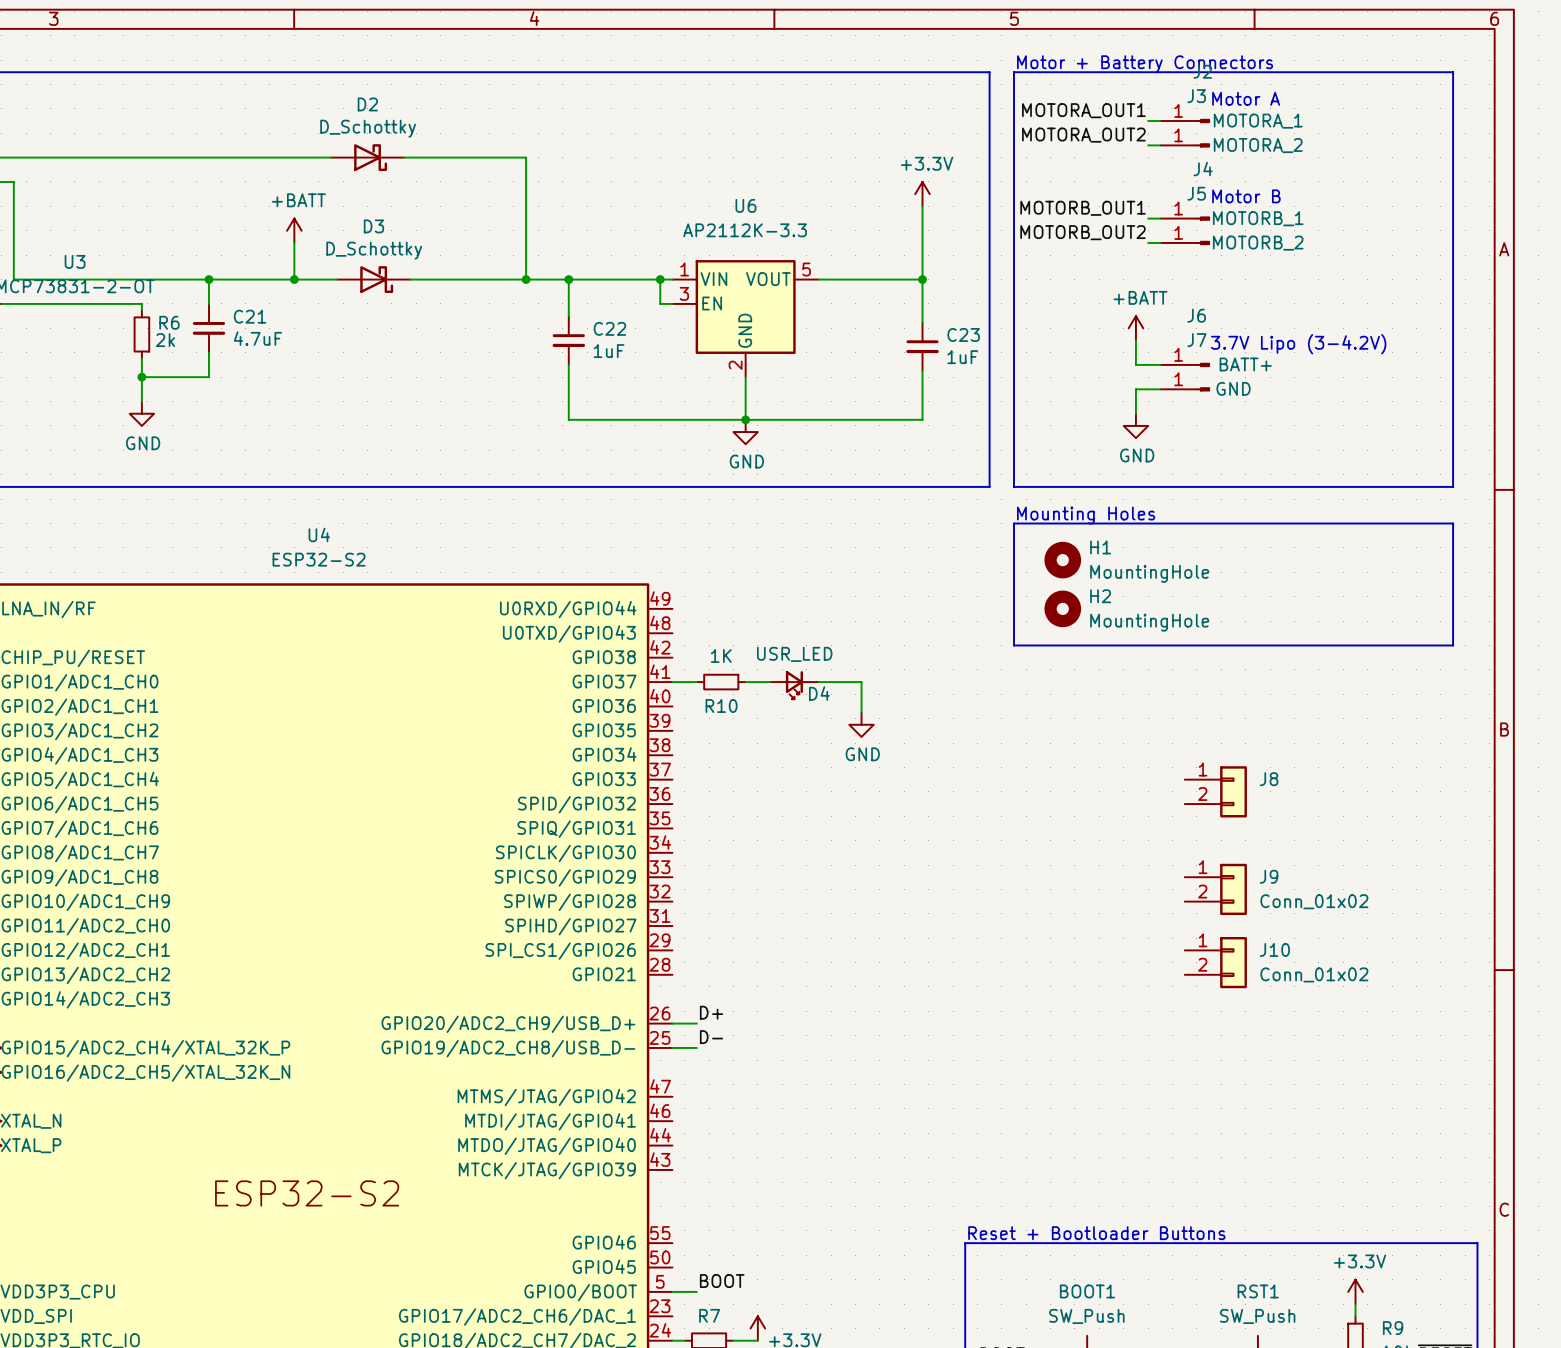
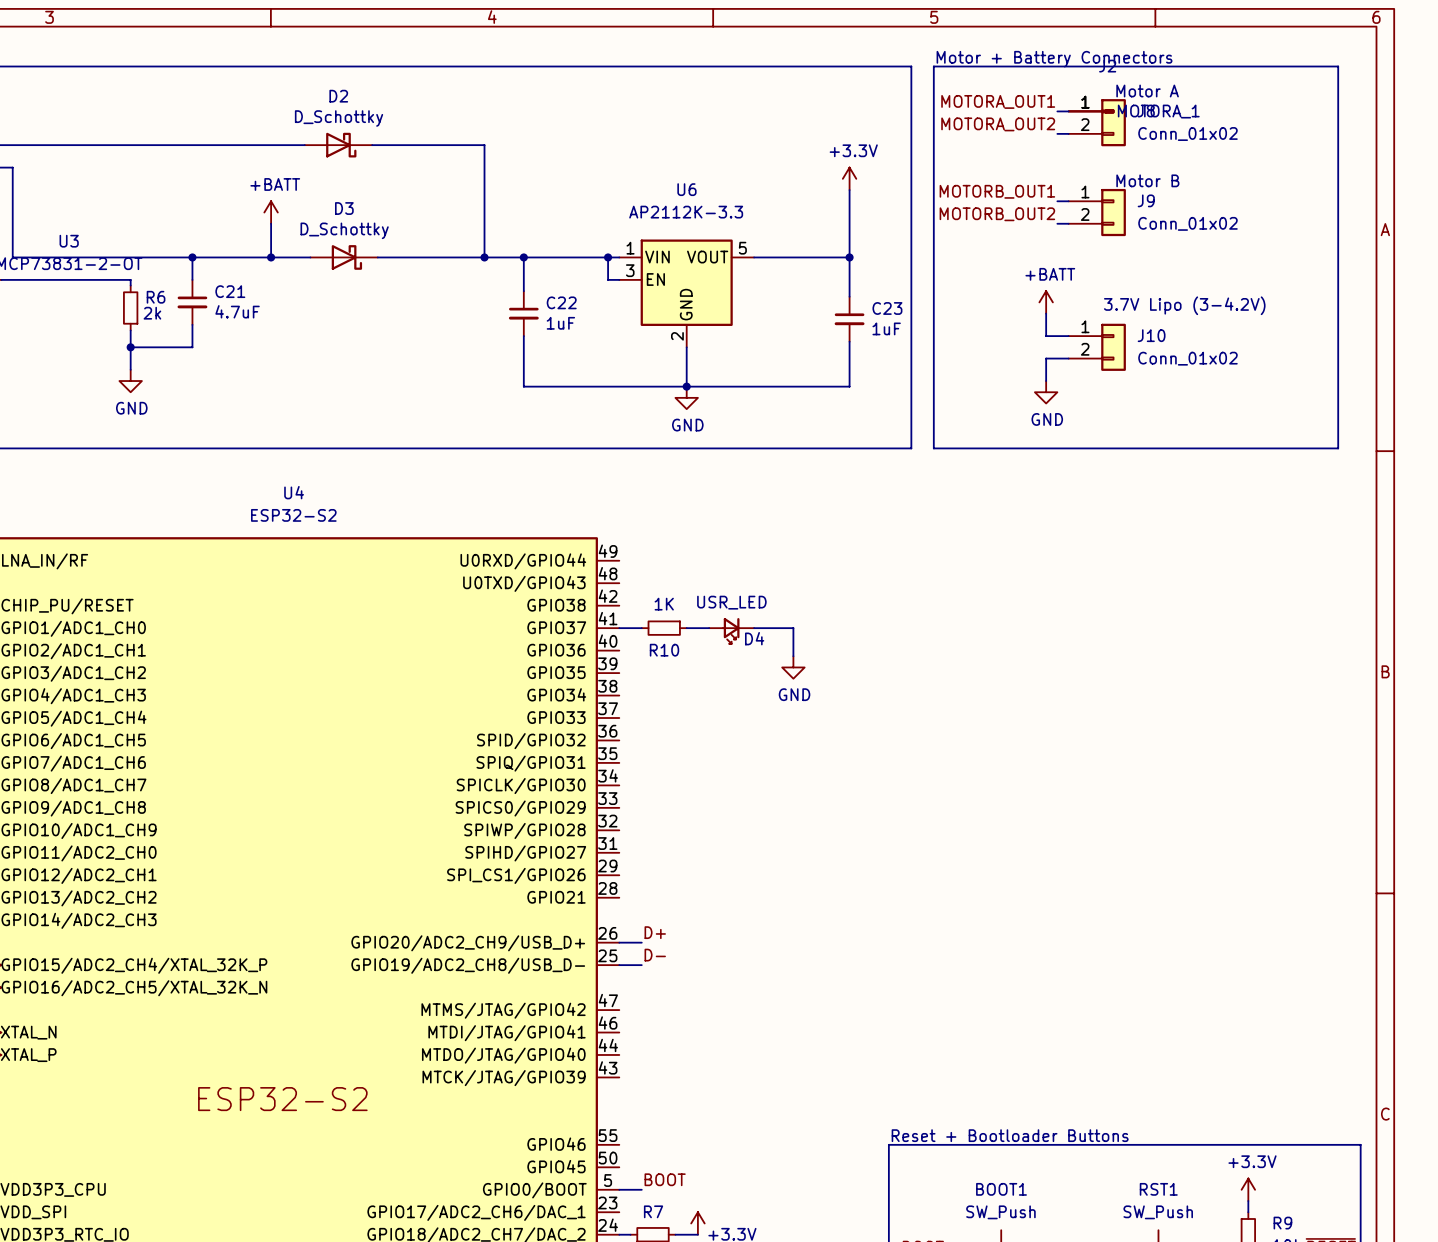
J3: MOTORA_2 (1185, 145) -> none
J8 value: none -> Conn_01x02 (1187, 134)
J4: MOTORB_1 (1185, 218) -> none
J5: MOTORB_2 (1185, 242) -> none
text position: 3.7V Lipo (3-4.2V) (1298, 344) -> 3.7V Lipo (3-4.2V) (1184, 305)
J6: BATT+ (1185, 364) -> none
J7: GND (1185, 389) -> none
text: Mounting Holes (1086, 515) -> none
line: (1013, 523) (1013, 645) (1453, 645) (1453, 523) (1013, 523) -> none
H1: MountingHole (1062, 560) -> none
H2: MountingHole (1062, 608) -> none
J8 position: (1215, 791) -> (1097, 122)
J9 position: (1215, 889) -> (1097, 212)
J10 position: (1215, 962) -> (1097, 347)

